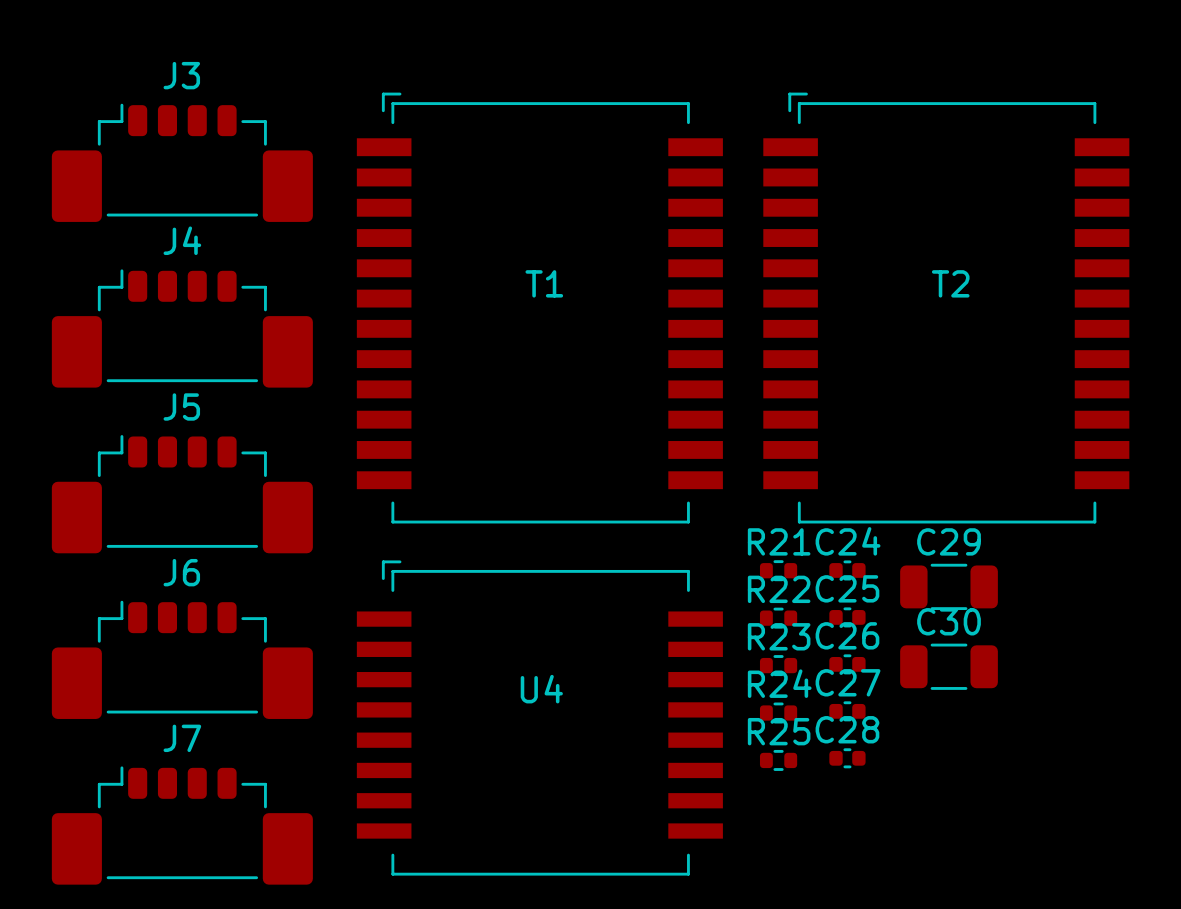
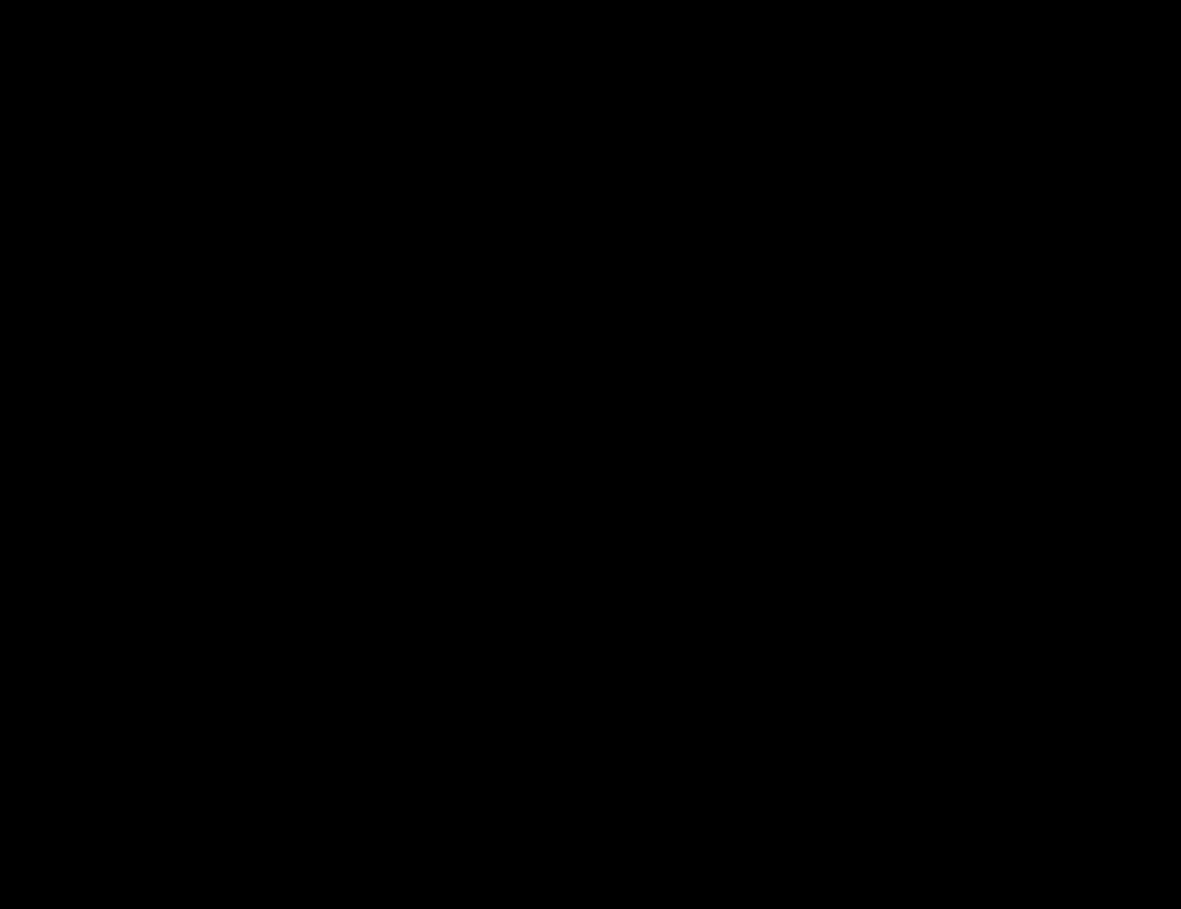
J3: (182, 162) -> none
T1: (539, 308) -> none
T2: (946, 308) -> none
J4: (182, 328) -> none
J5: (182, 494) -> none
R21: (778, 570) -> none
C24: (847, 570) -> none
C29: (949, 586) -> none
C25: (847, 617) -> none
R22: (778, 618) -> none
J6: (182, 659) -> none
C26: (847, 664) -> none
R23: (778, 665) -> none
C30: (949, 666) -> none
C27: (847, 711) -> none
R24: (778, 713) -> none
U4: (539, 718) -> none
C28: (847, 758) -> none
R25: (778, 760) -> none
J7: (182, 825) -> none

